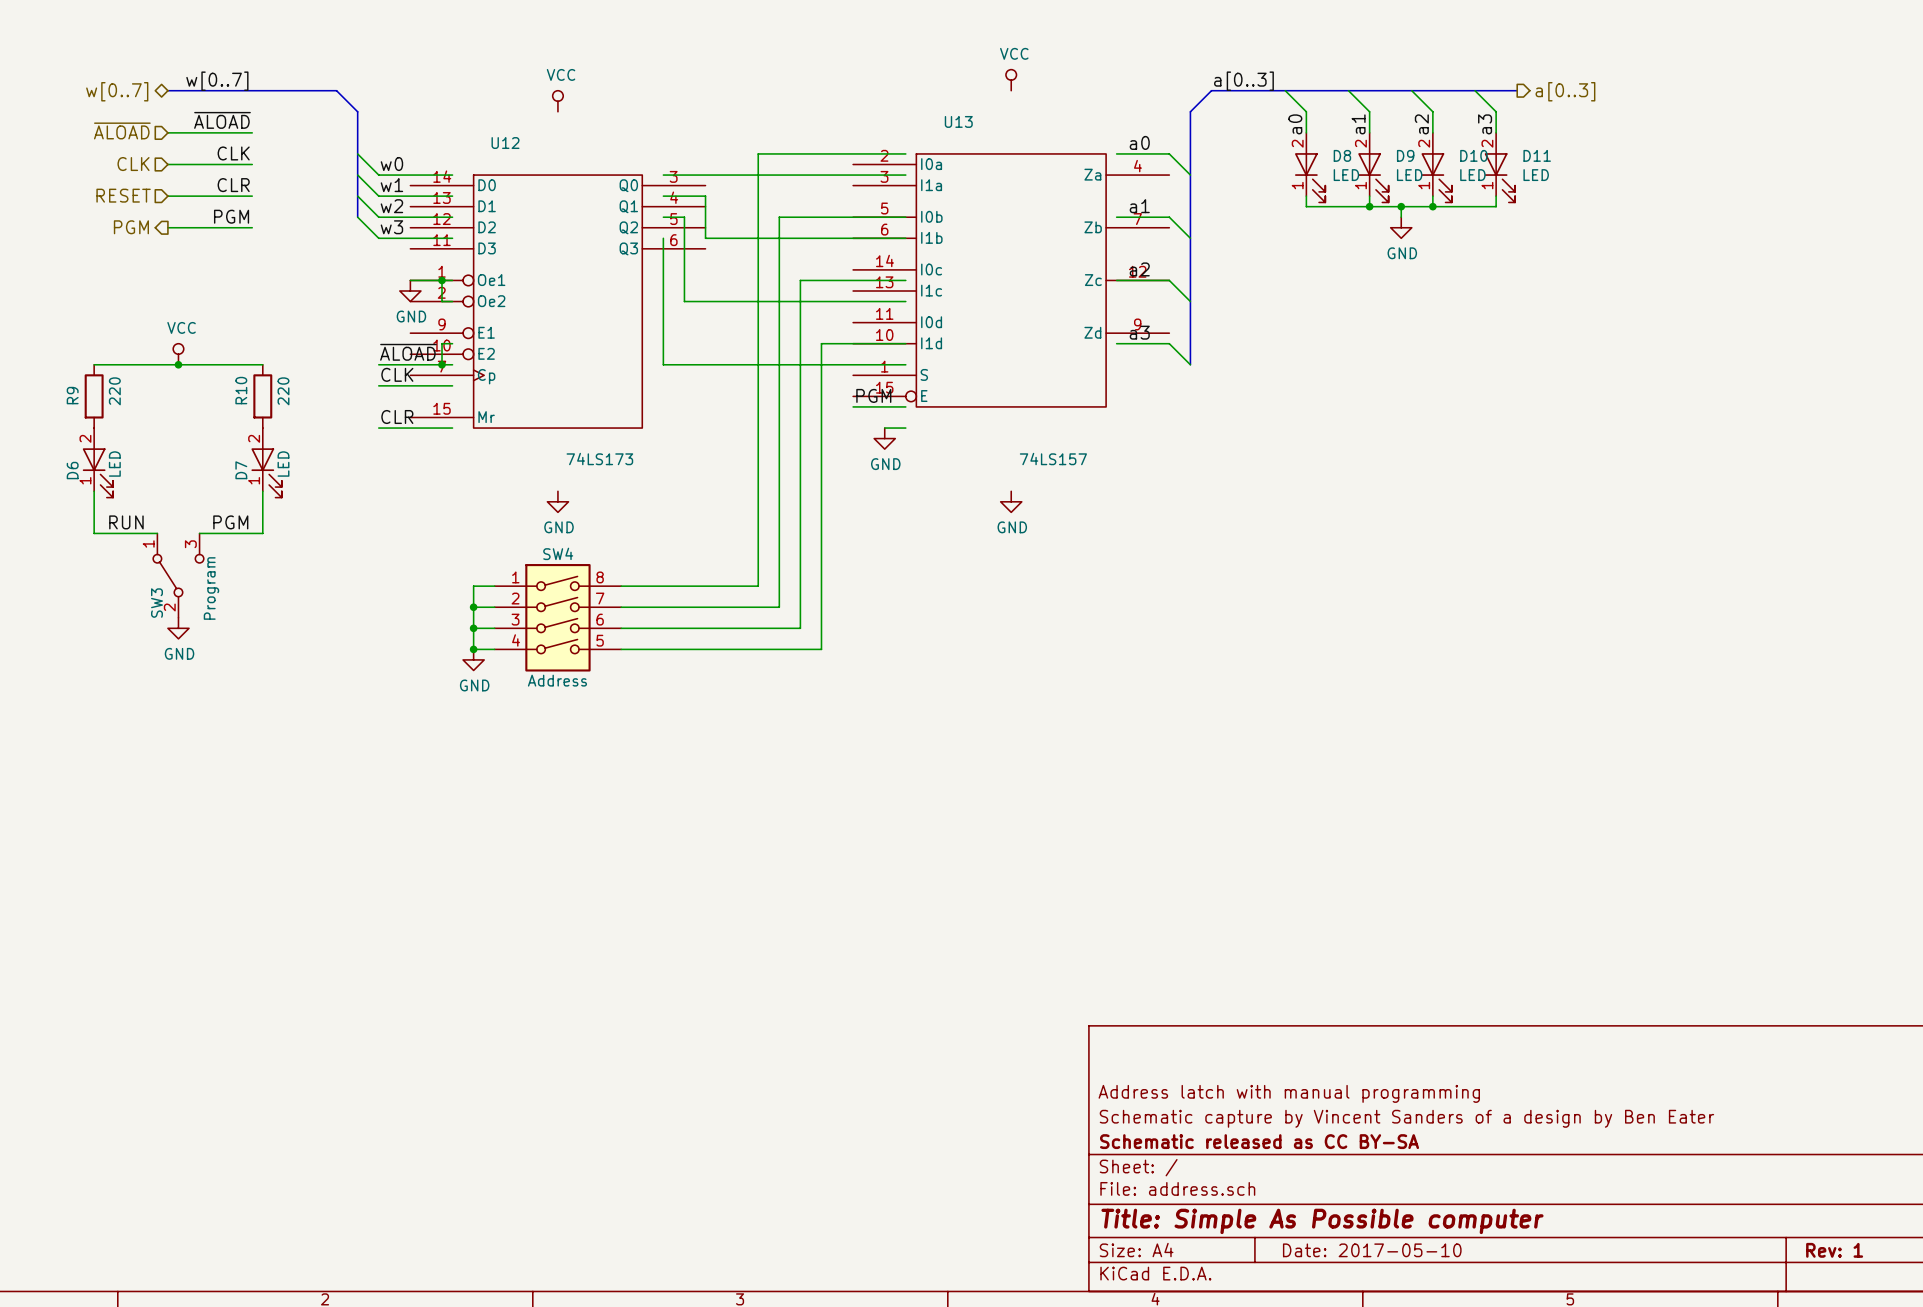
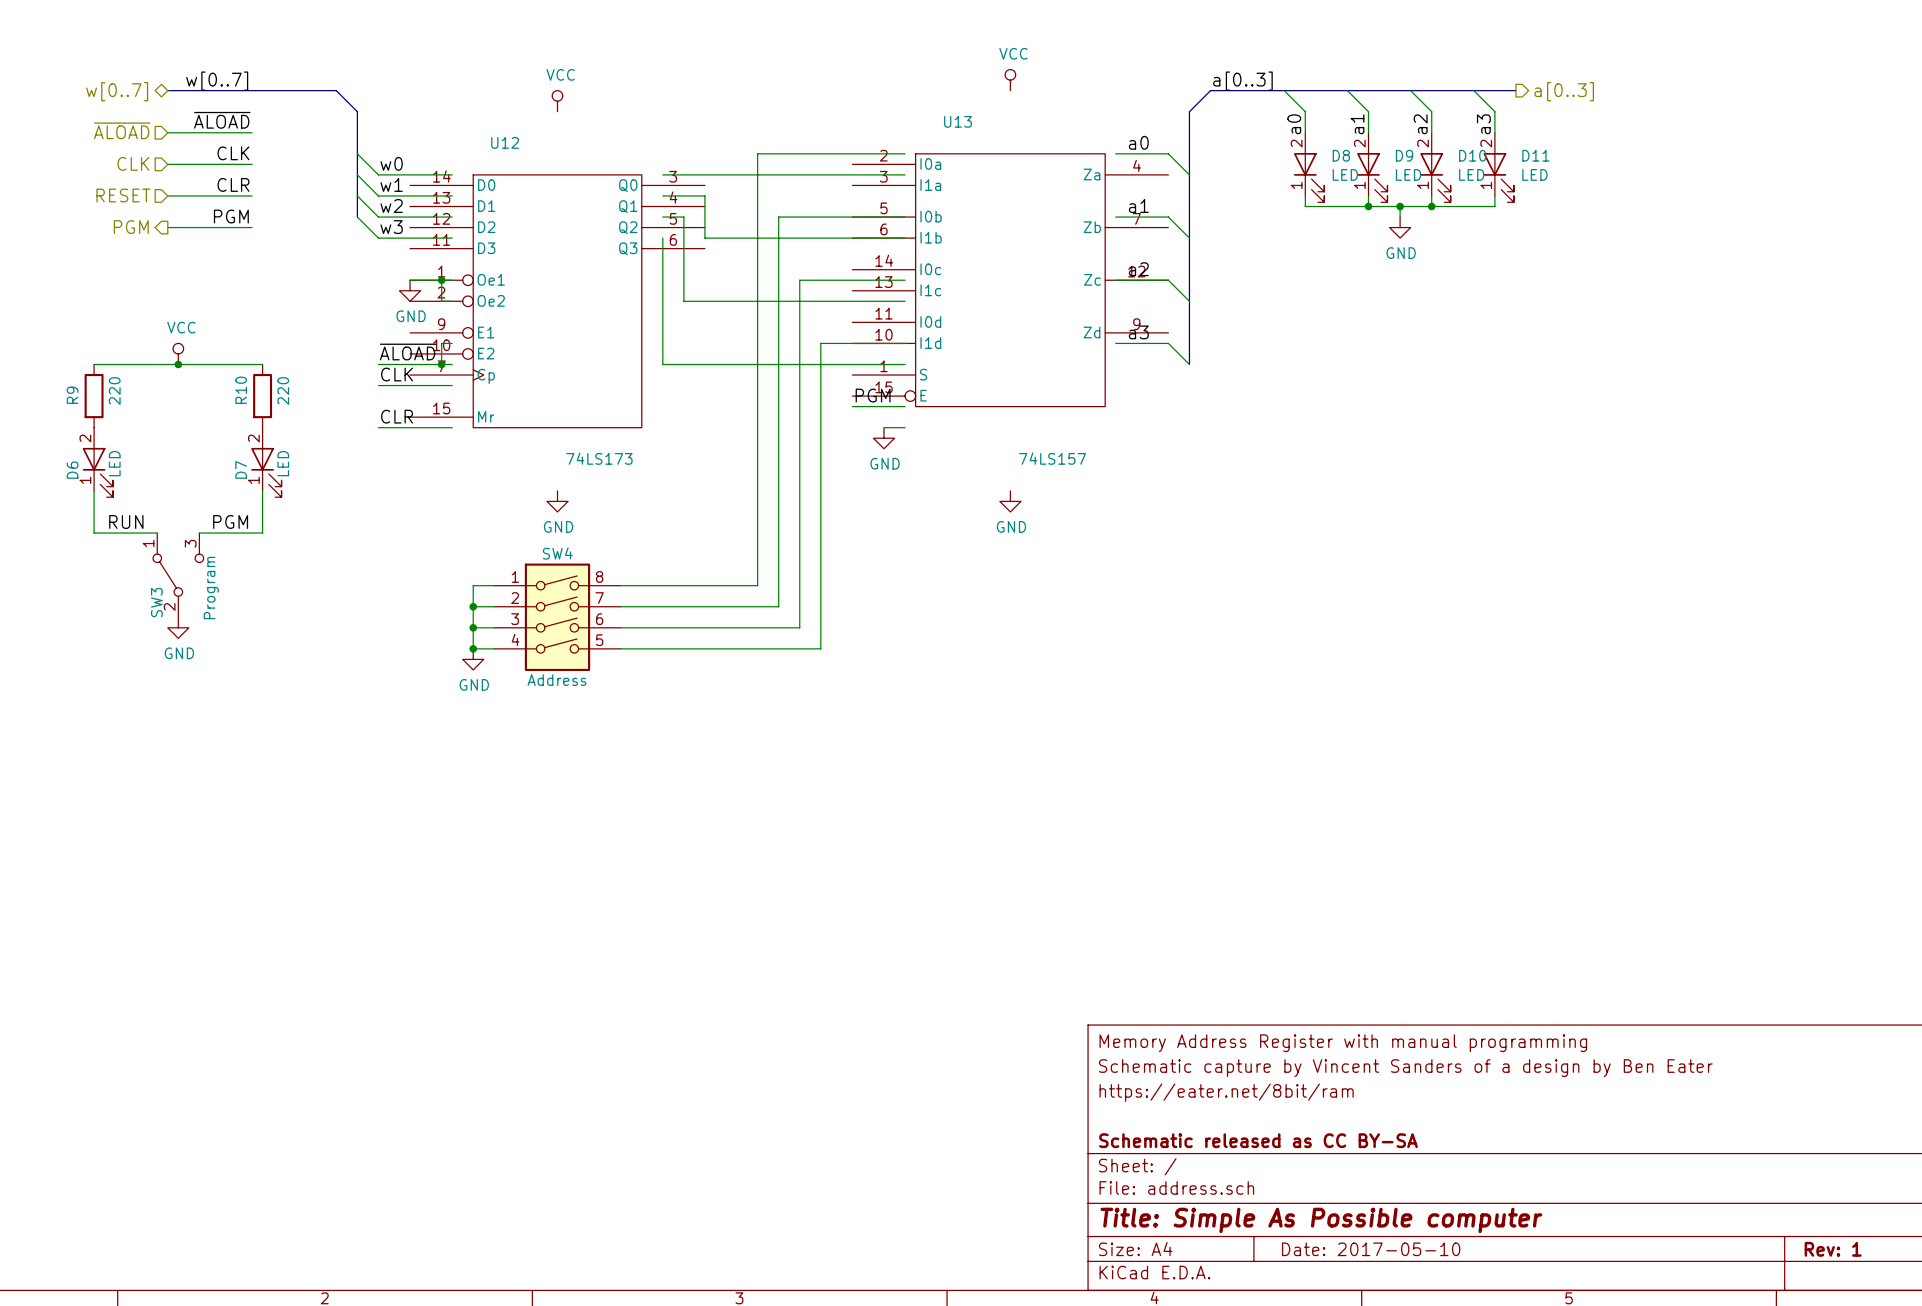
title block: none -> Memory Address Register with manual programming (1343, 1043)
title block: Address latch with manual programming (1289, 1093) -> https://eater.net/8bit/ram (1226, 1092)
title block position: Schematic capture by Vincent Sanders of a design by Ben Eater (1406, 1118) -> Schematic capture by Vincent Sanders of a design by Ben Eater (1405, 1068)

